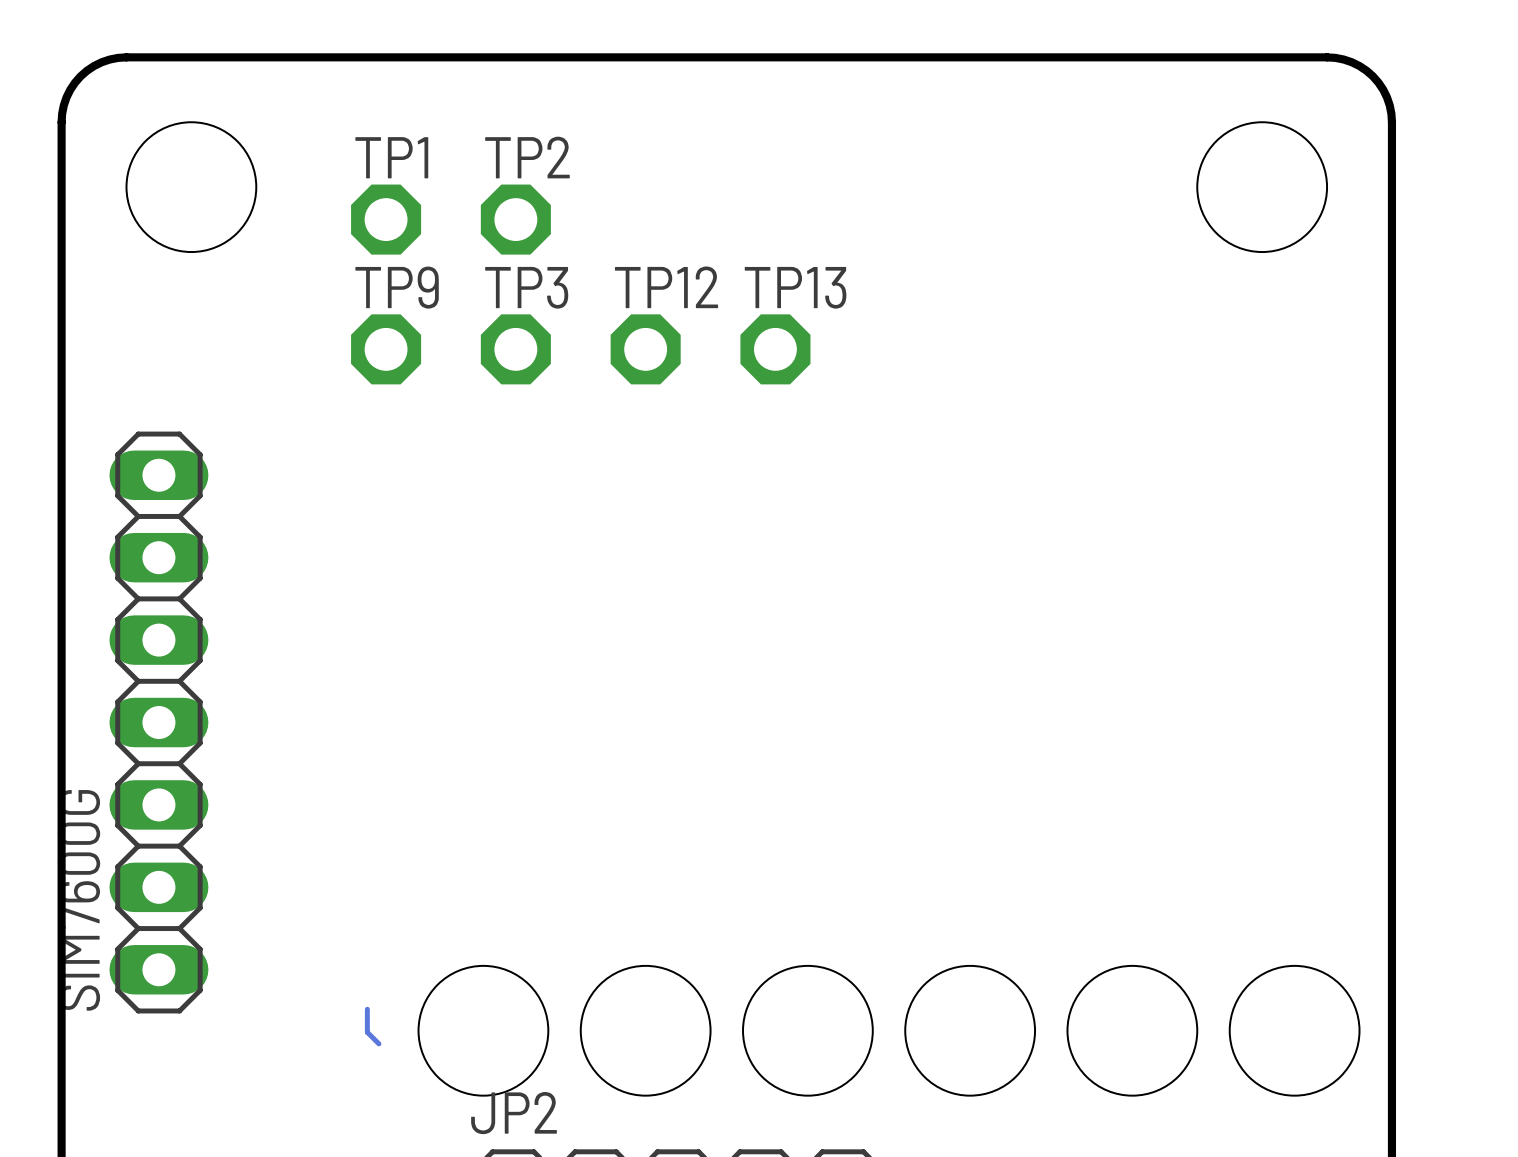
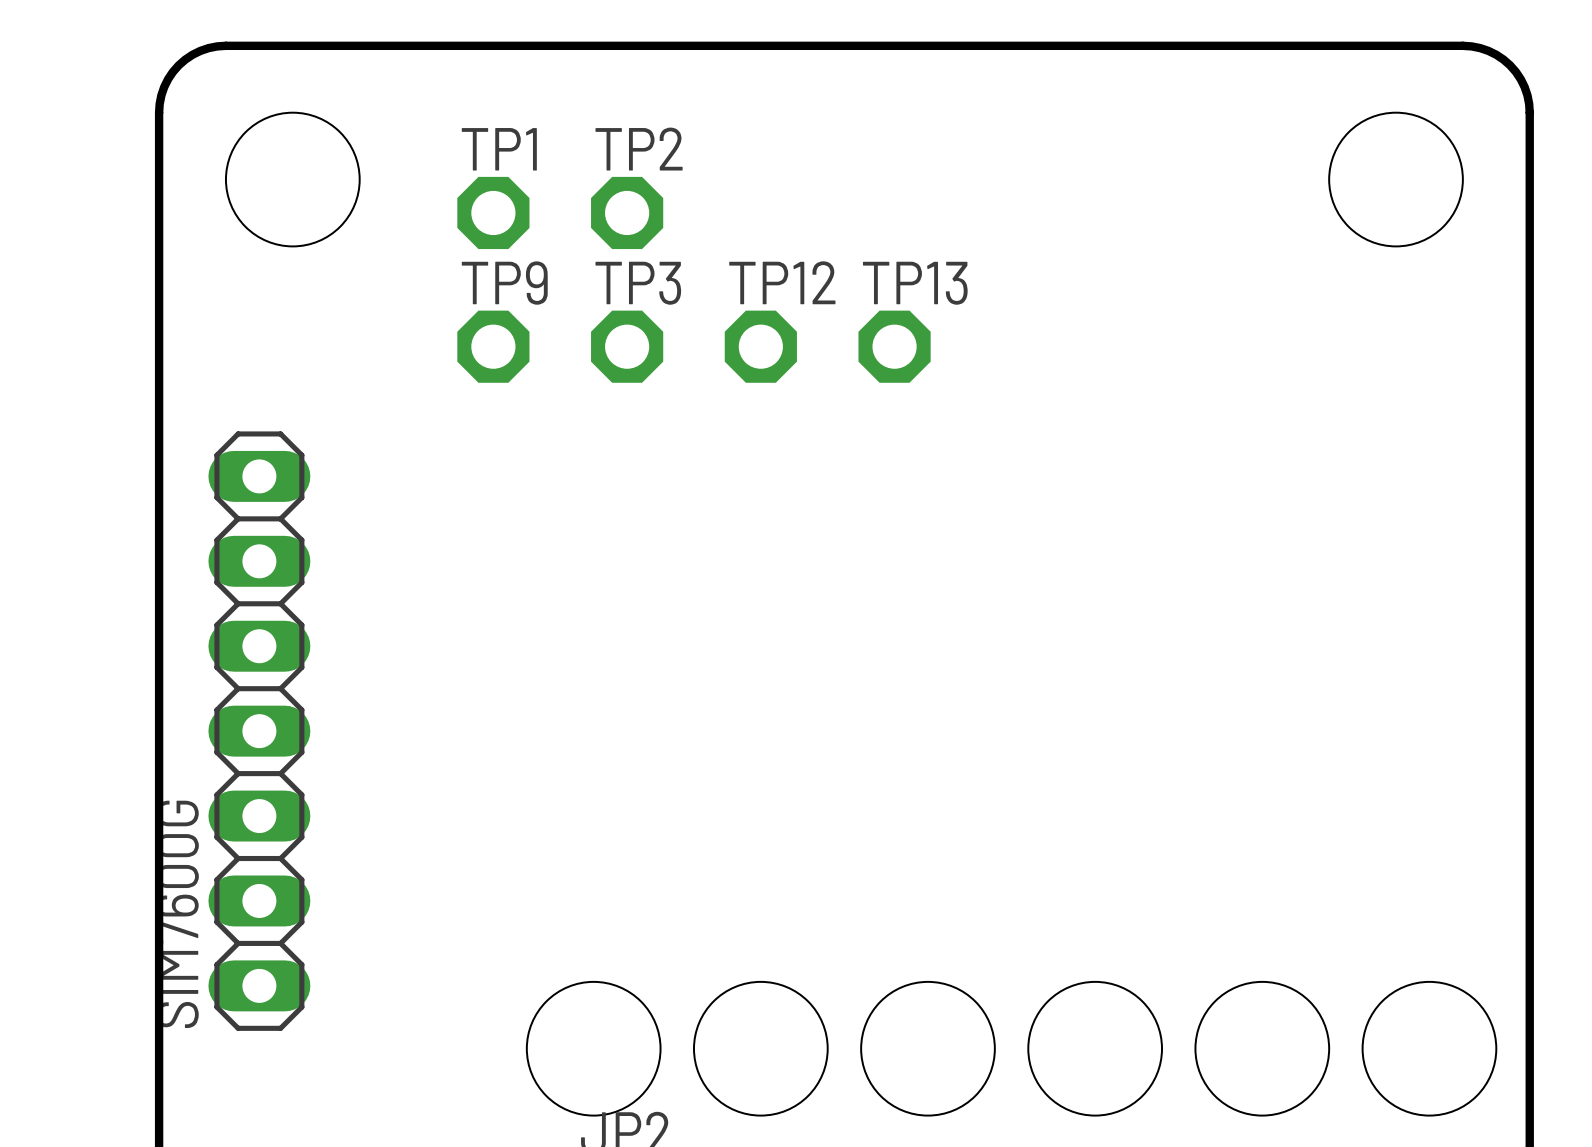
bottom track: (367, 1009) (367, 1032) (378, 1043) -> none

